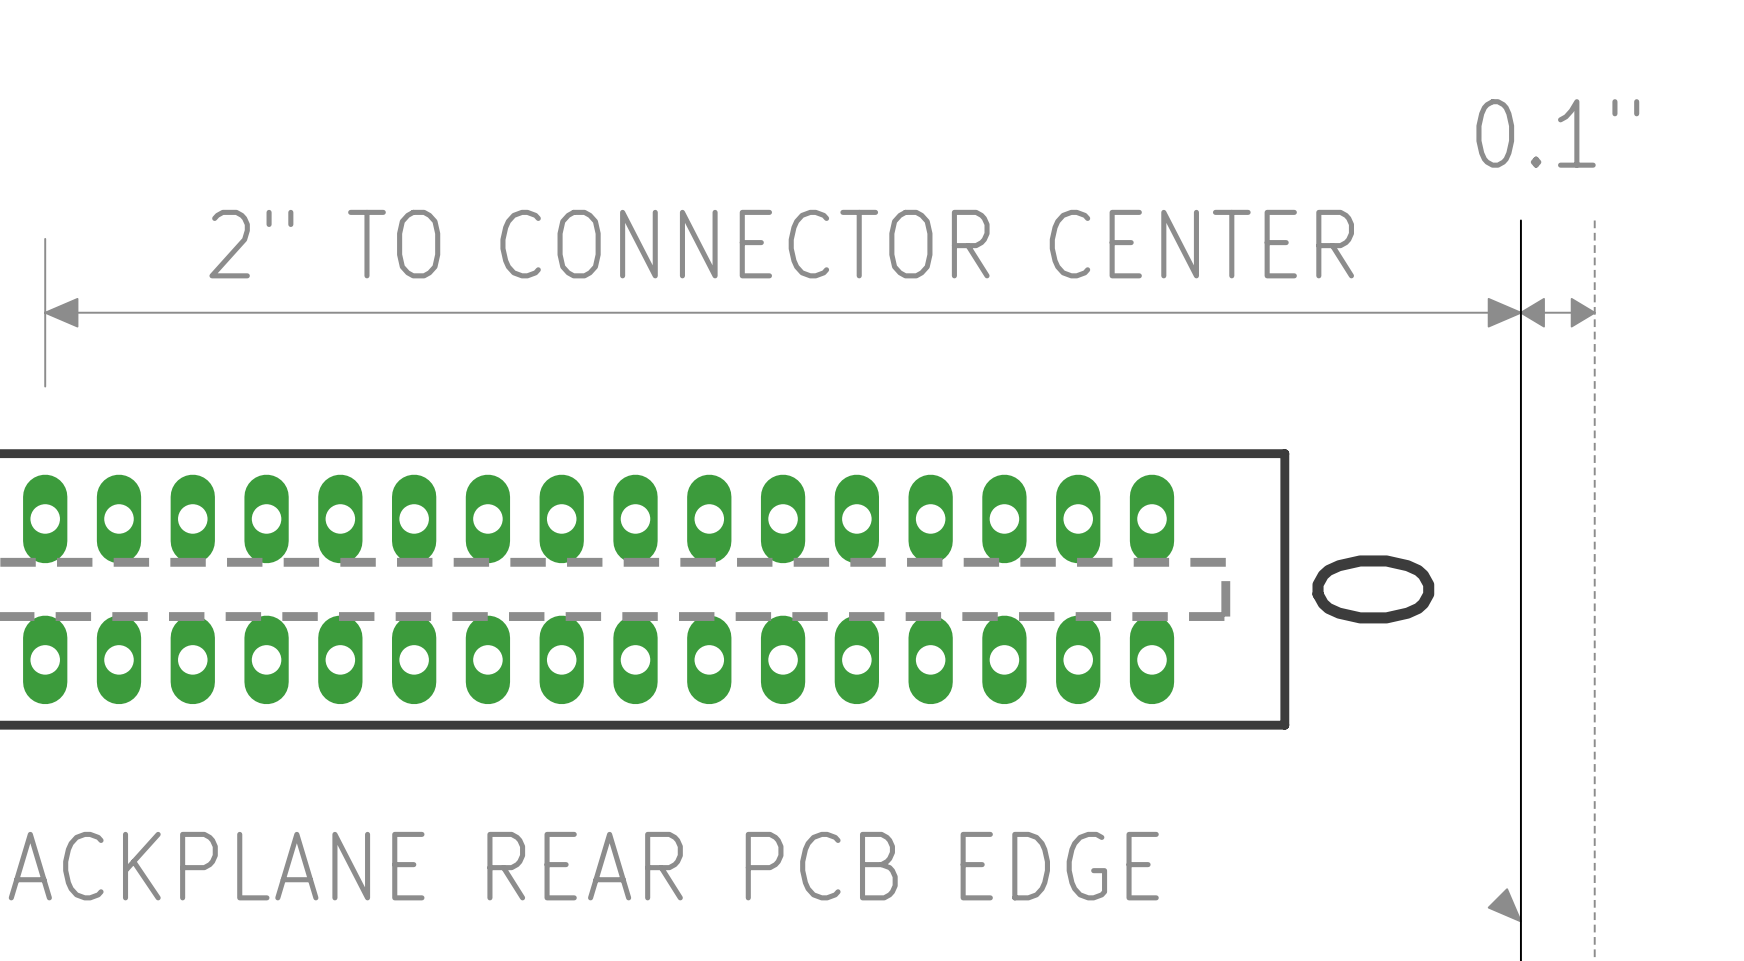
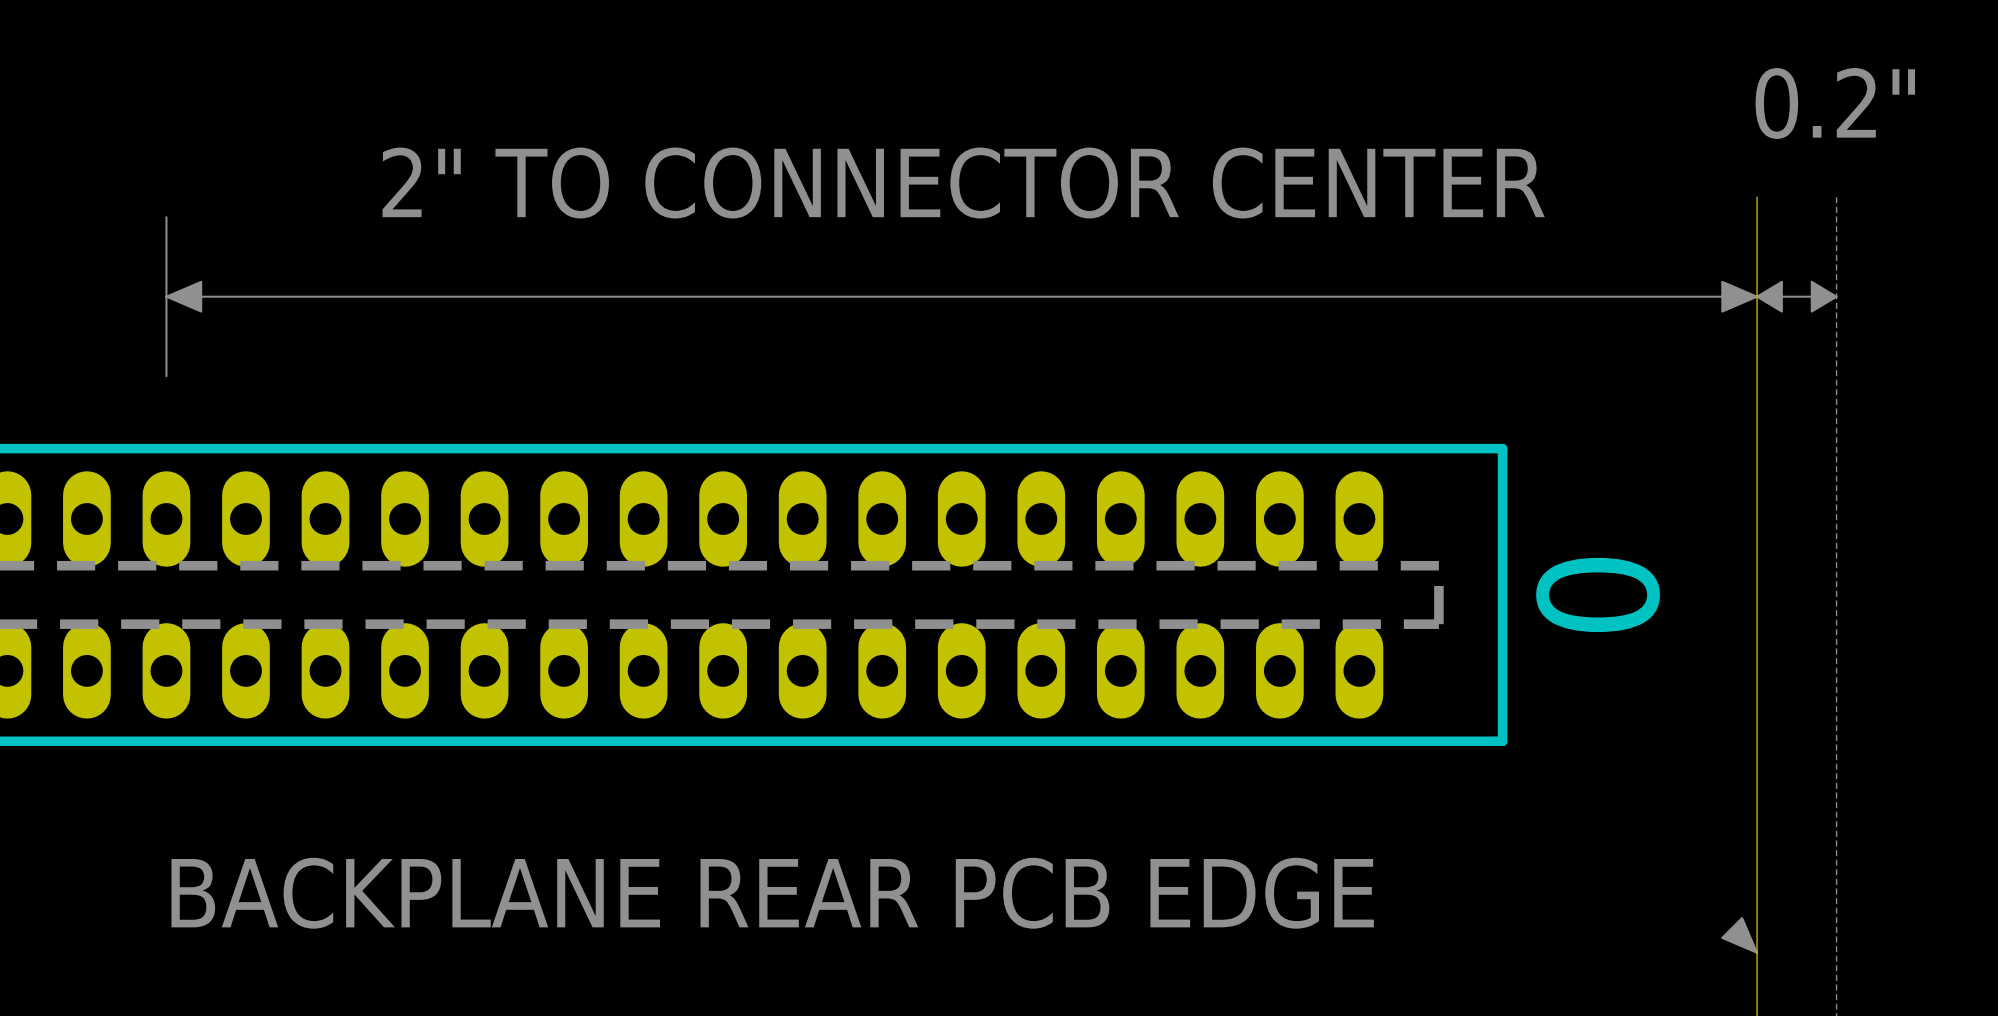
text: 0.1" (1557, 133) -> 0.2" (1835, 103)
text position: 2" TO CONNECTOR CENTER (781, 244) -> 2" TO CONNECTOR CENTER (963, 183)

